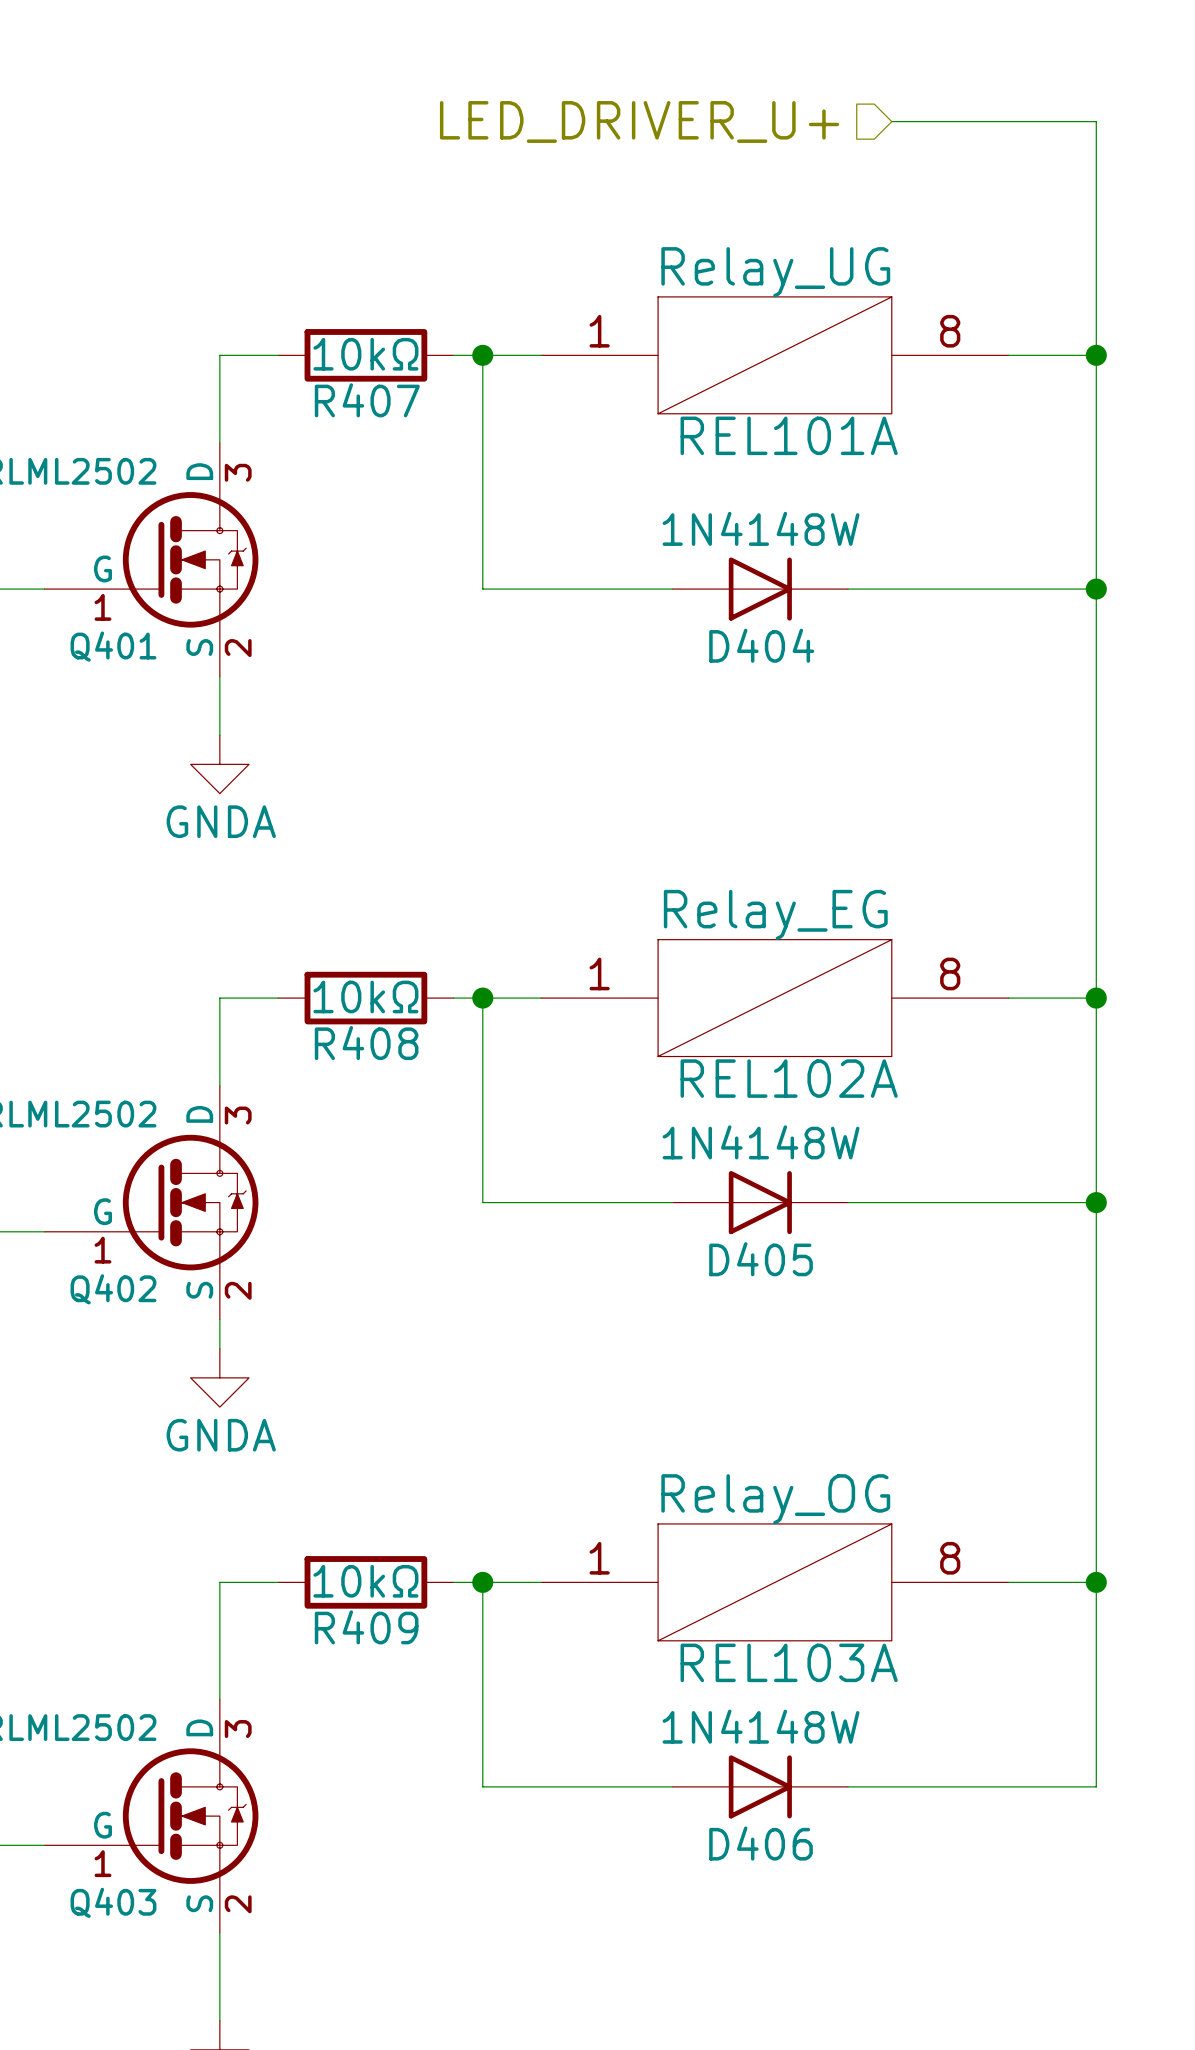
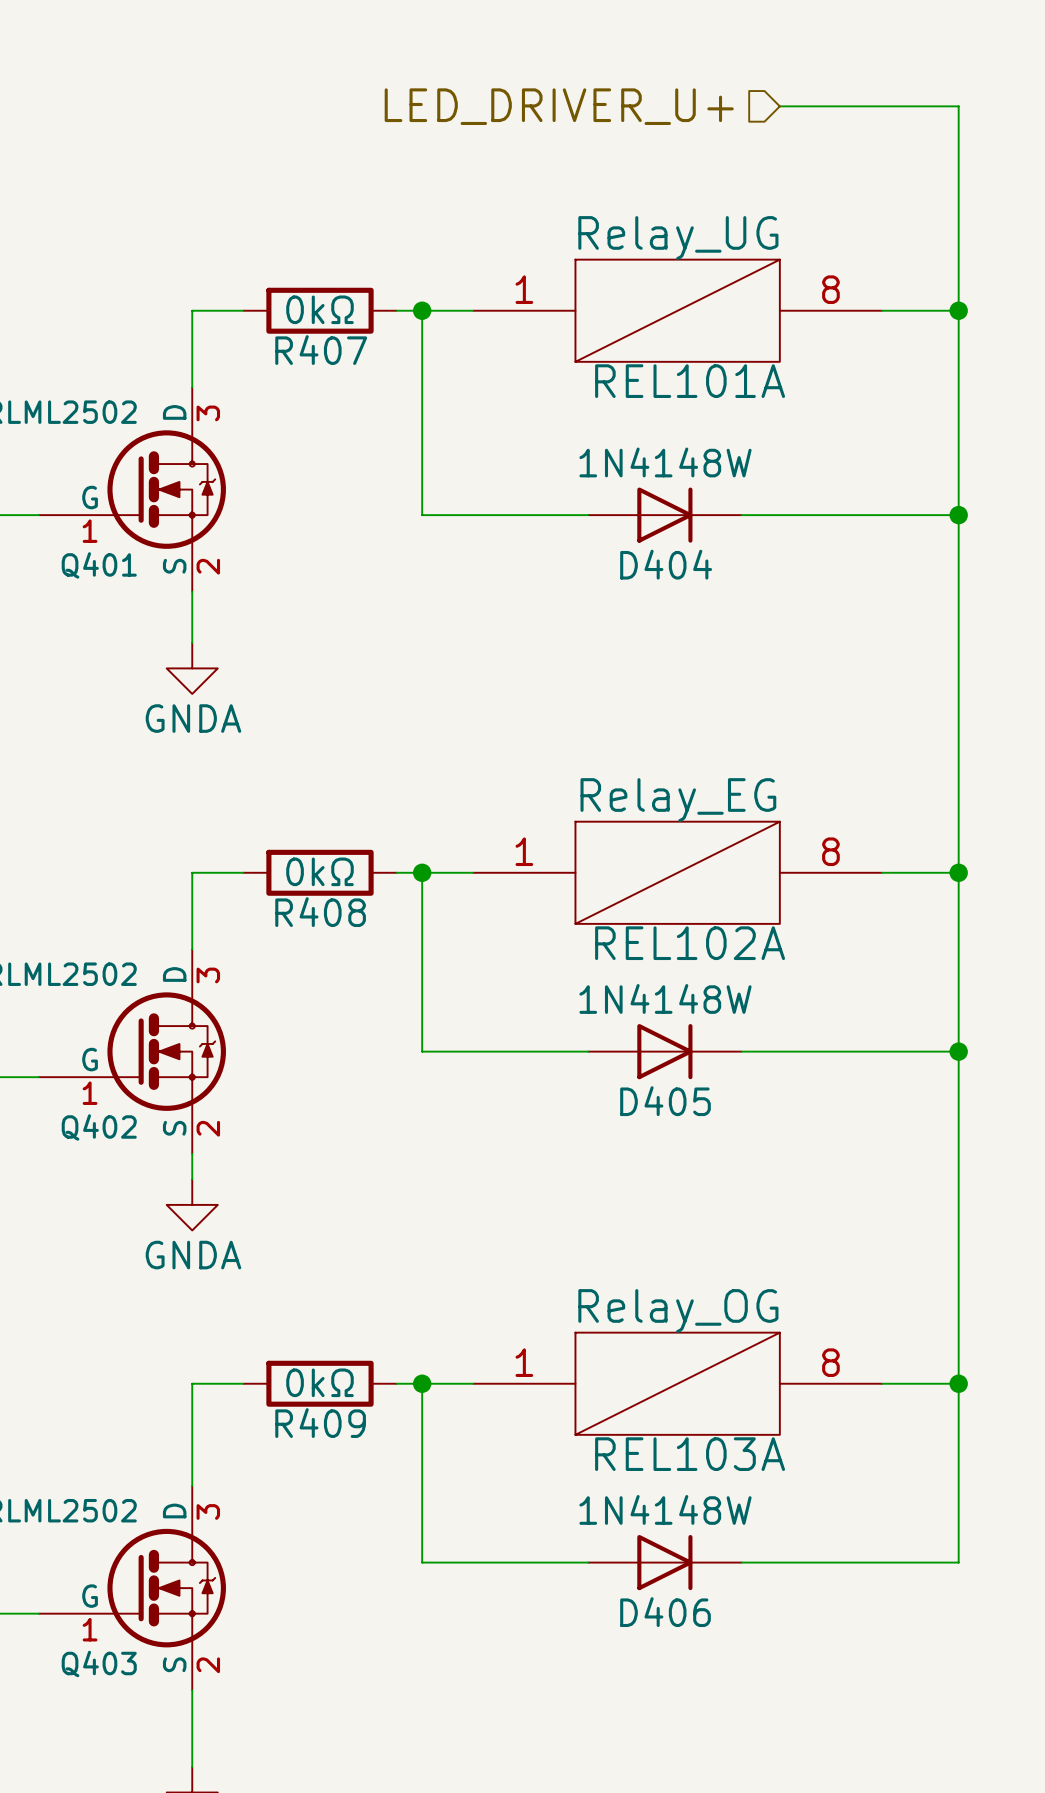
R407 value: 10kΩ (365, 354) -> 0kΩ (319, 309)
R408 value: 10kΩ (365, 996) -> 0kΩ (319, 871)
R409 value: 10kΩ (365, 1581) -> 0kΩ (319, 1382)

